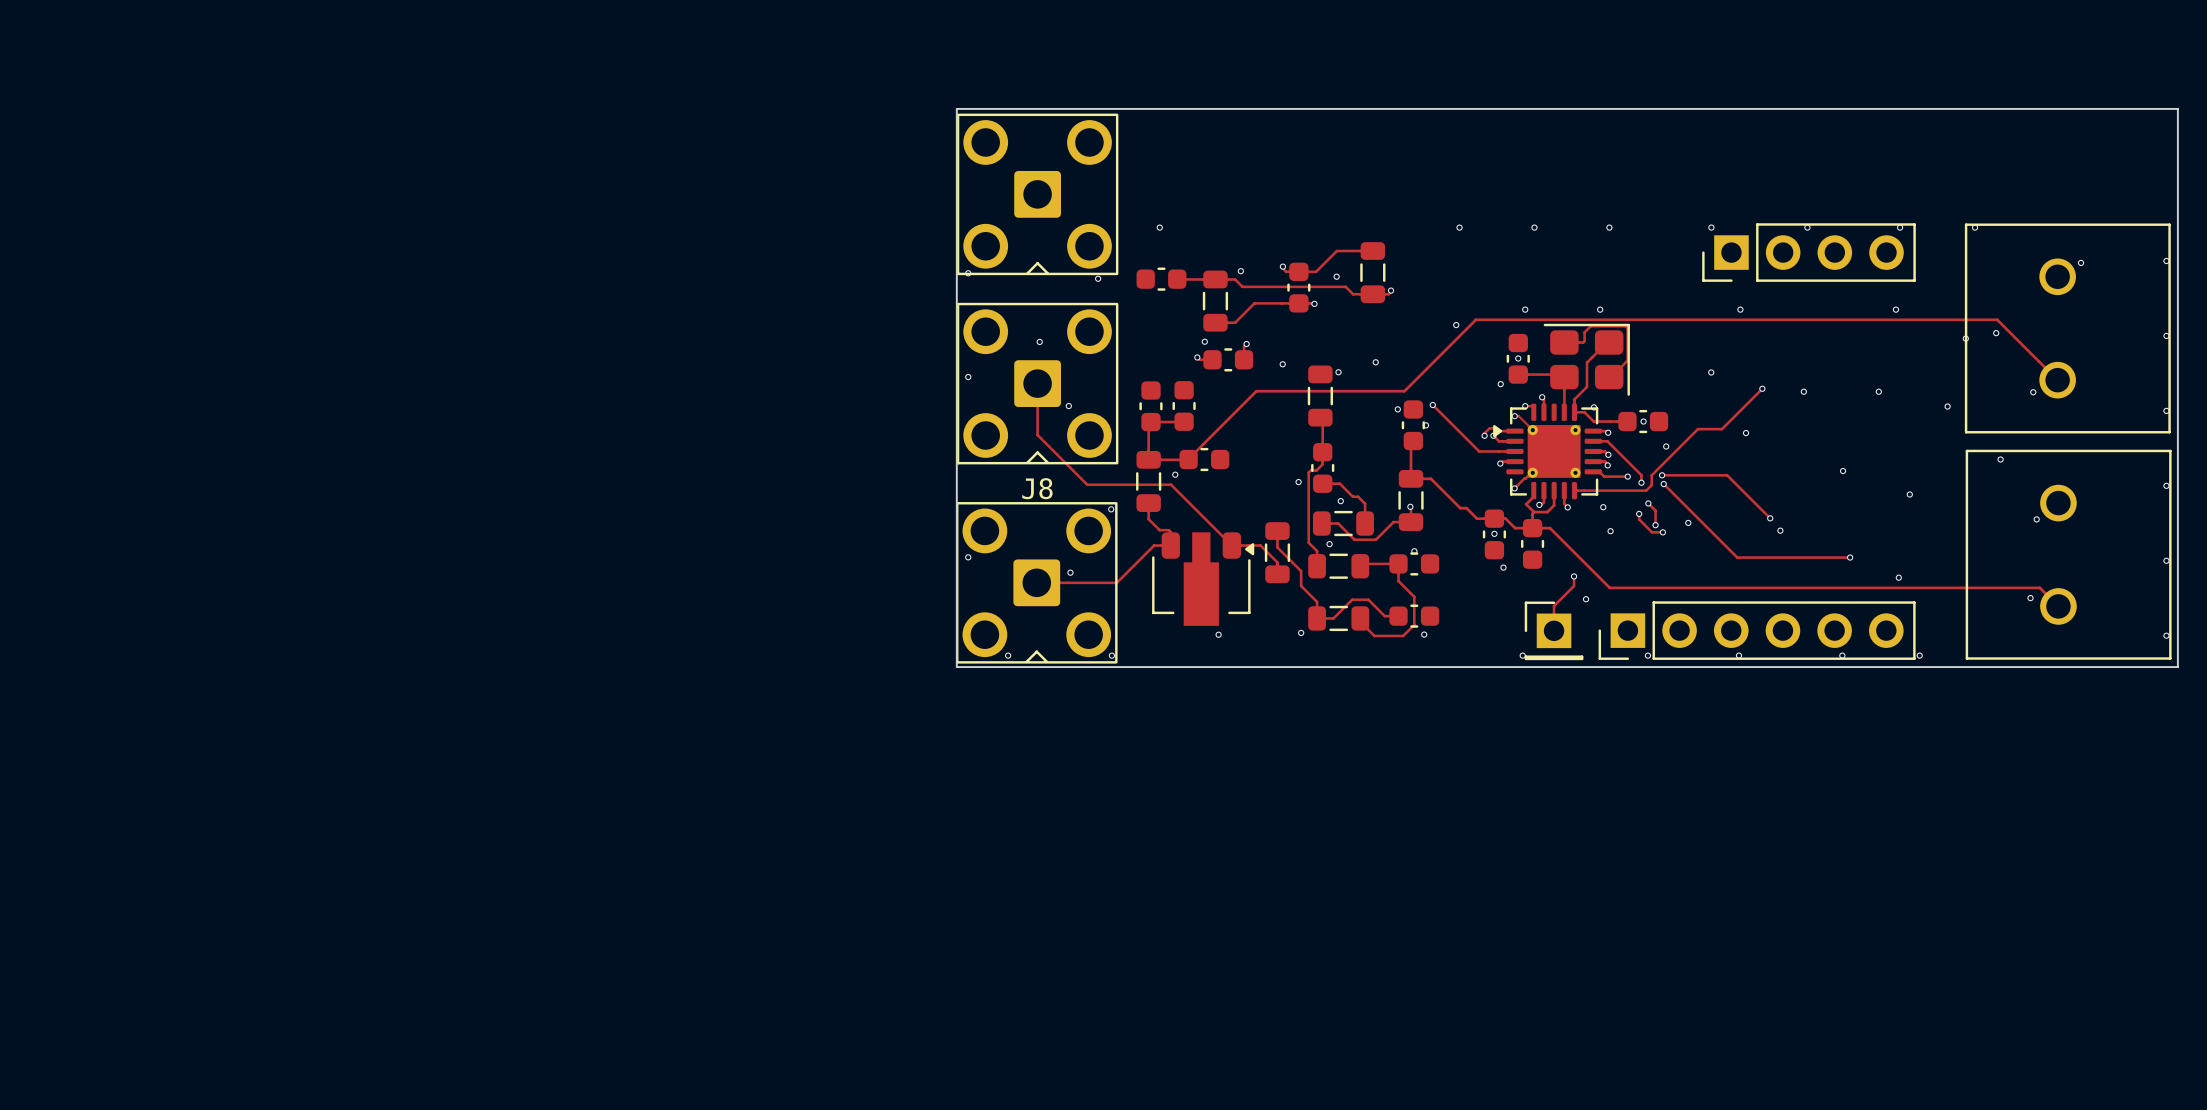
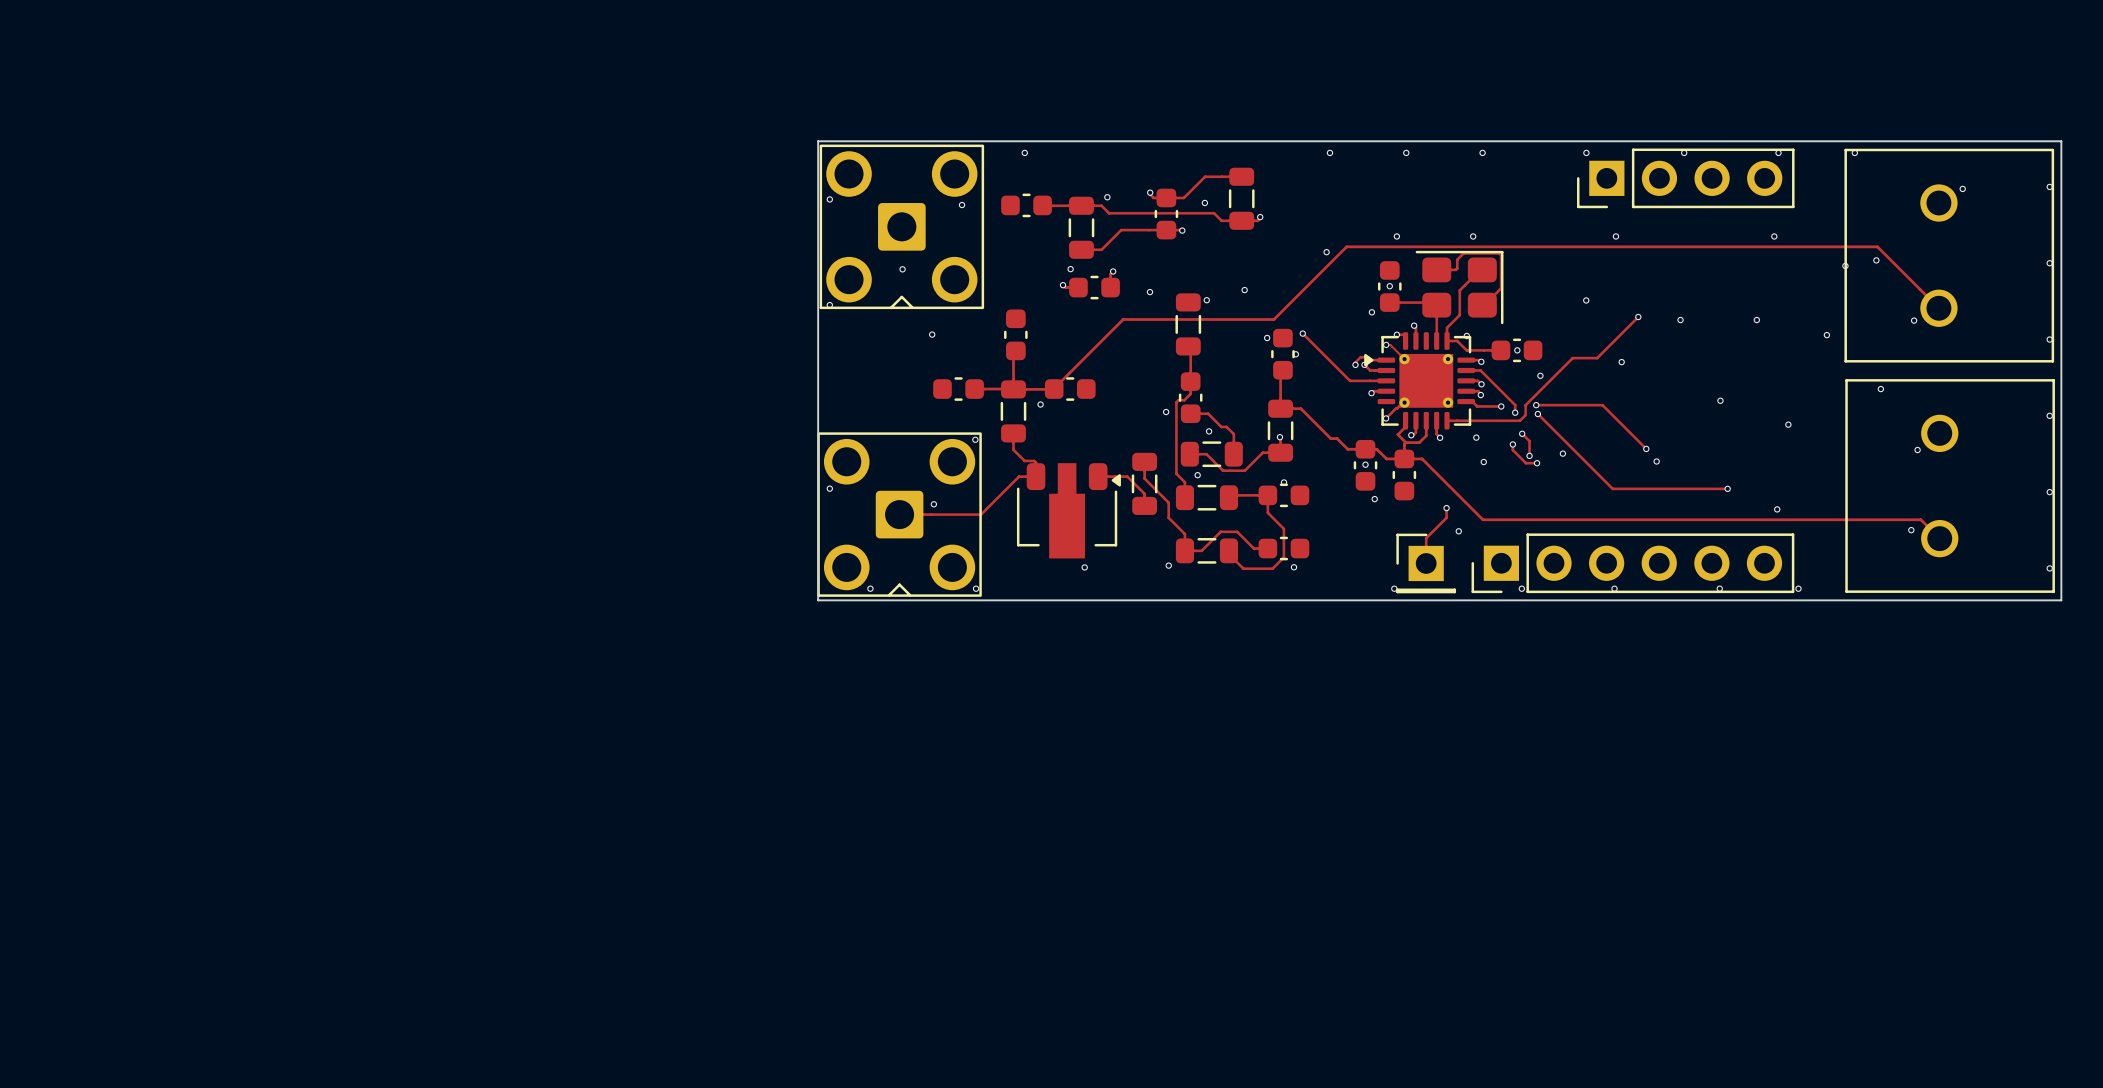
part position: (1037, 194) -> (901, 226)
board edge: (956, 216) (956, 108) (2177, 108) (2177, 216) -> (818, 141) (2061, 141)
track: (1037, 383) (1037, 435) (1087, 484) (1171, 484) (1231, 545) -> none
J8: (1037, 383) -> none
part rotation: 0° (1184, 405) -> 90° clockwise (958, 389)
part position: (1184, 405) -> (958, 389)
track: (1150, 422) (1183, 422) -> none
track: none -> (974, 389) (1013, 389)

